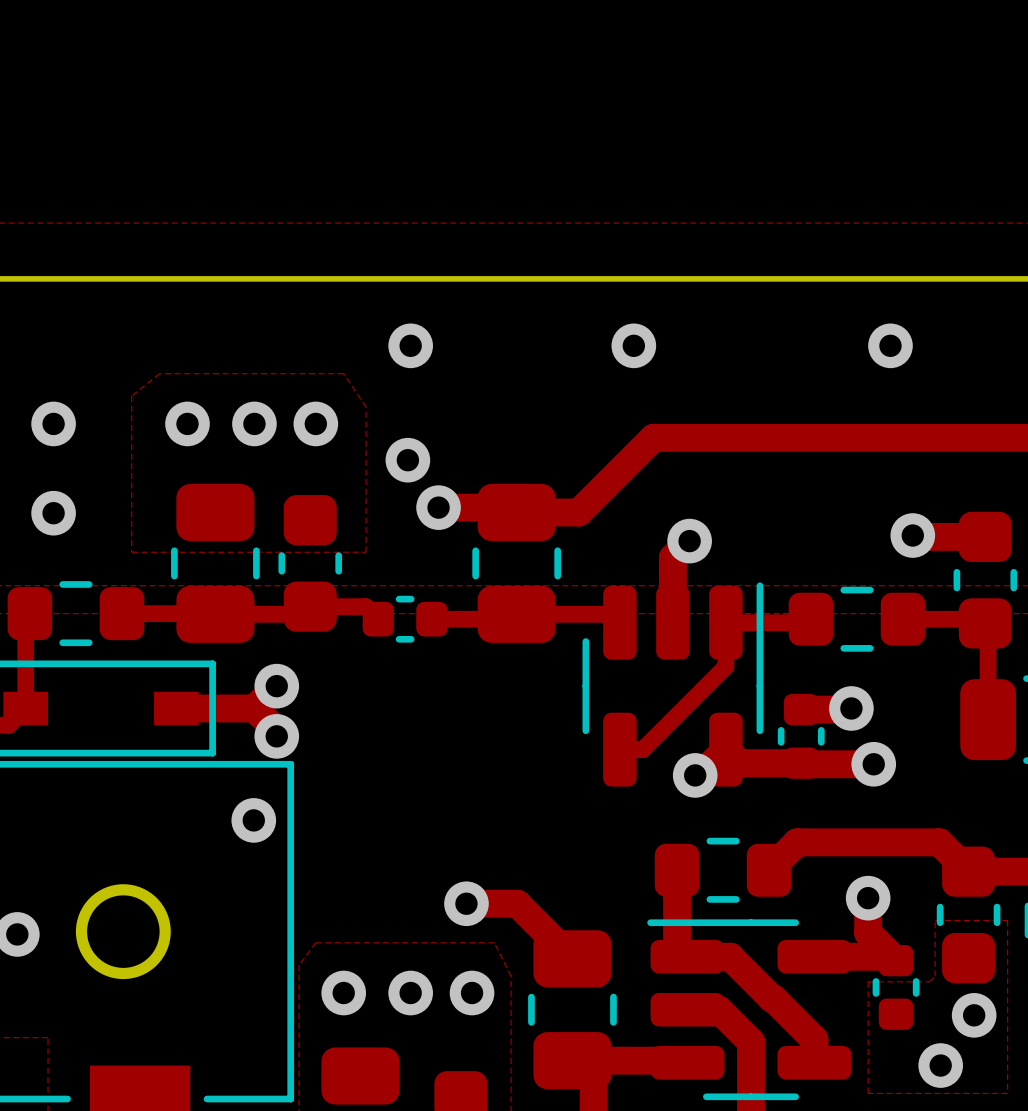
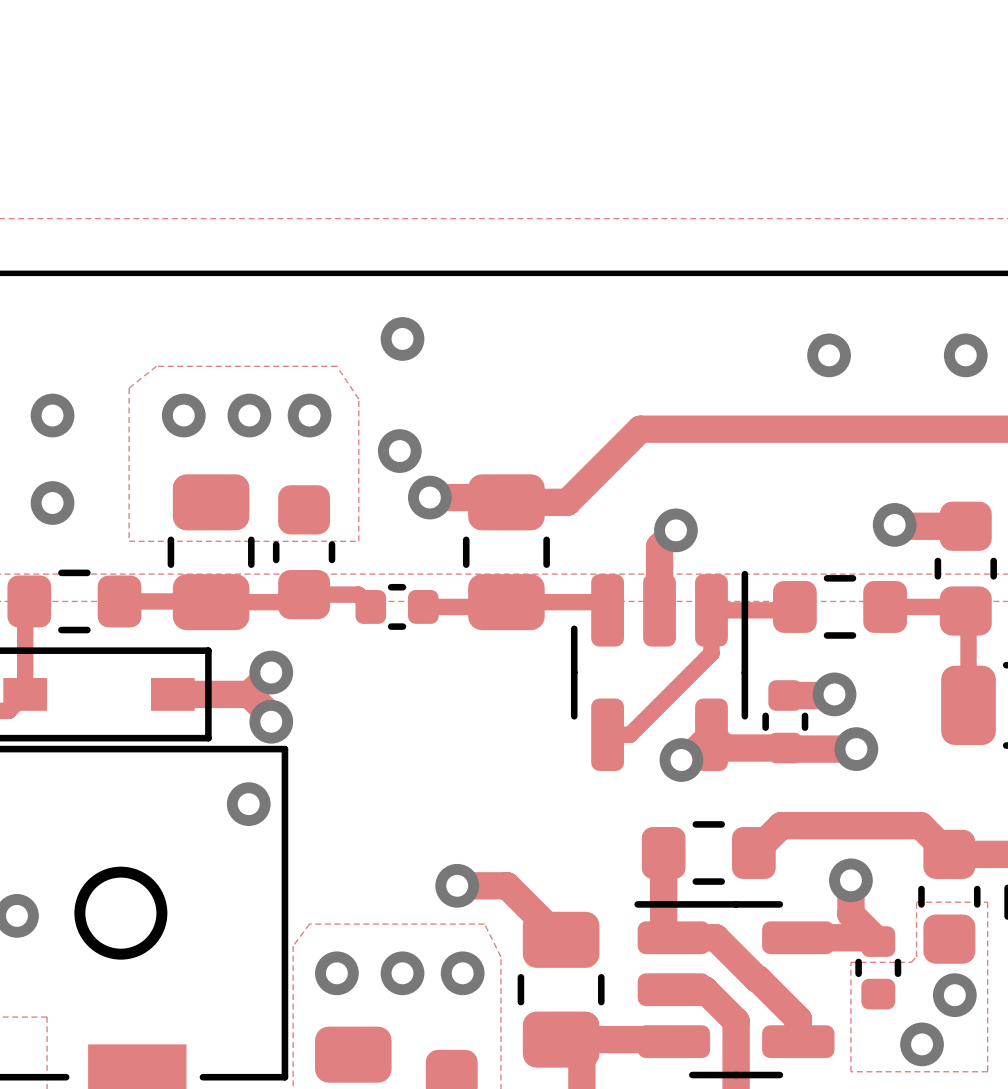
via: (633, 345) -> none
via position: (890, 345) -> (829, 355)
via: none -> (965, 355)

